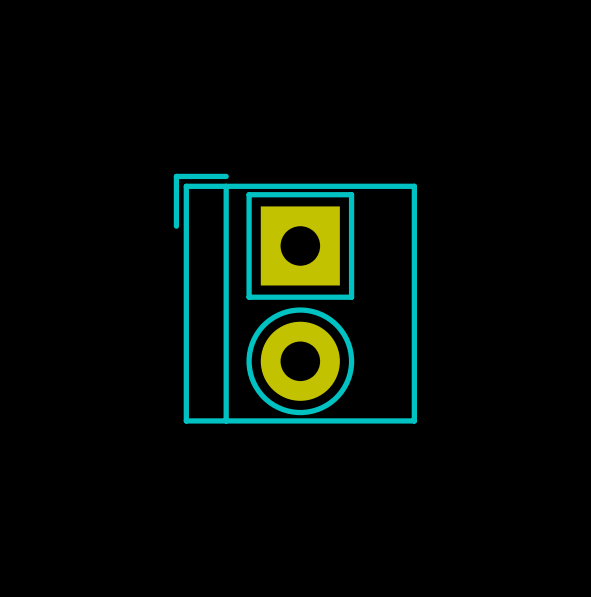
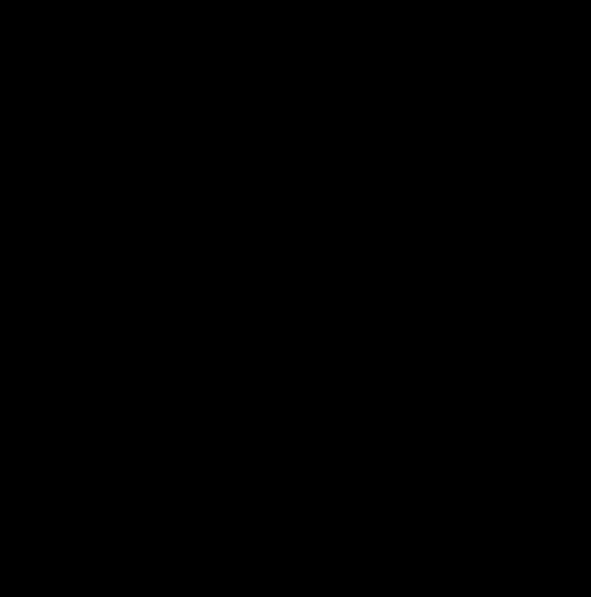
part: (295, 298) -> none

